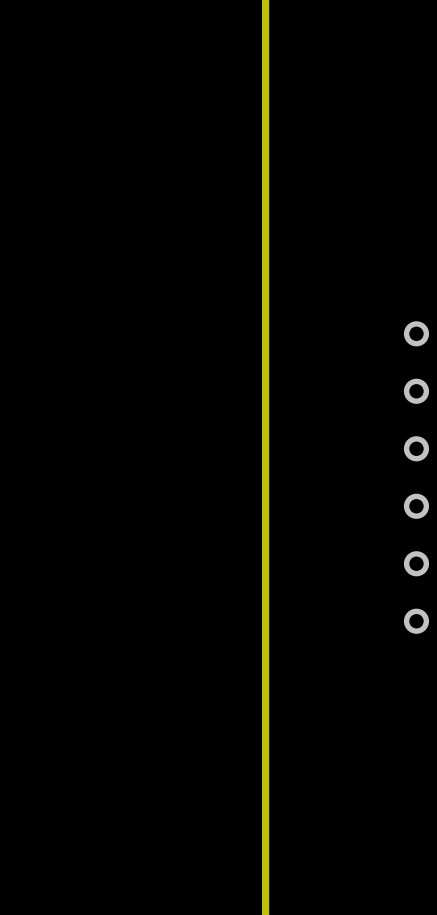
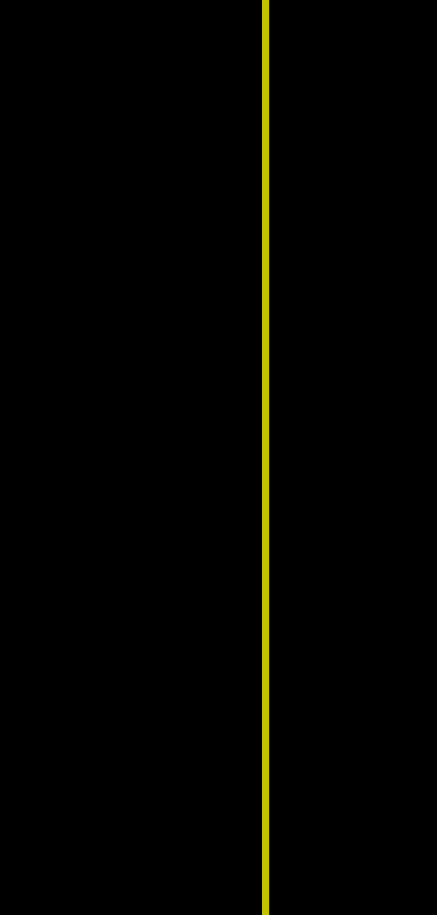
via: (416, 333) -> none
via: (416, 391) -> none
via: (416, 448) -> none
via: (416, 506) -> none
via: (416, 563) -> none
via: (416, 621) -> none

